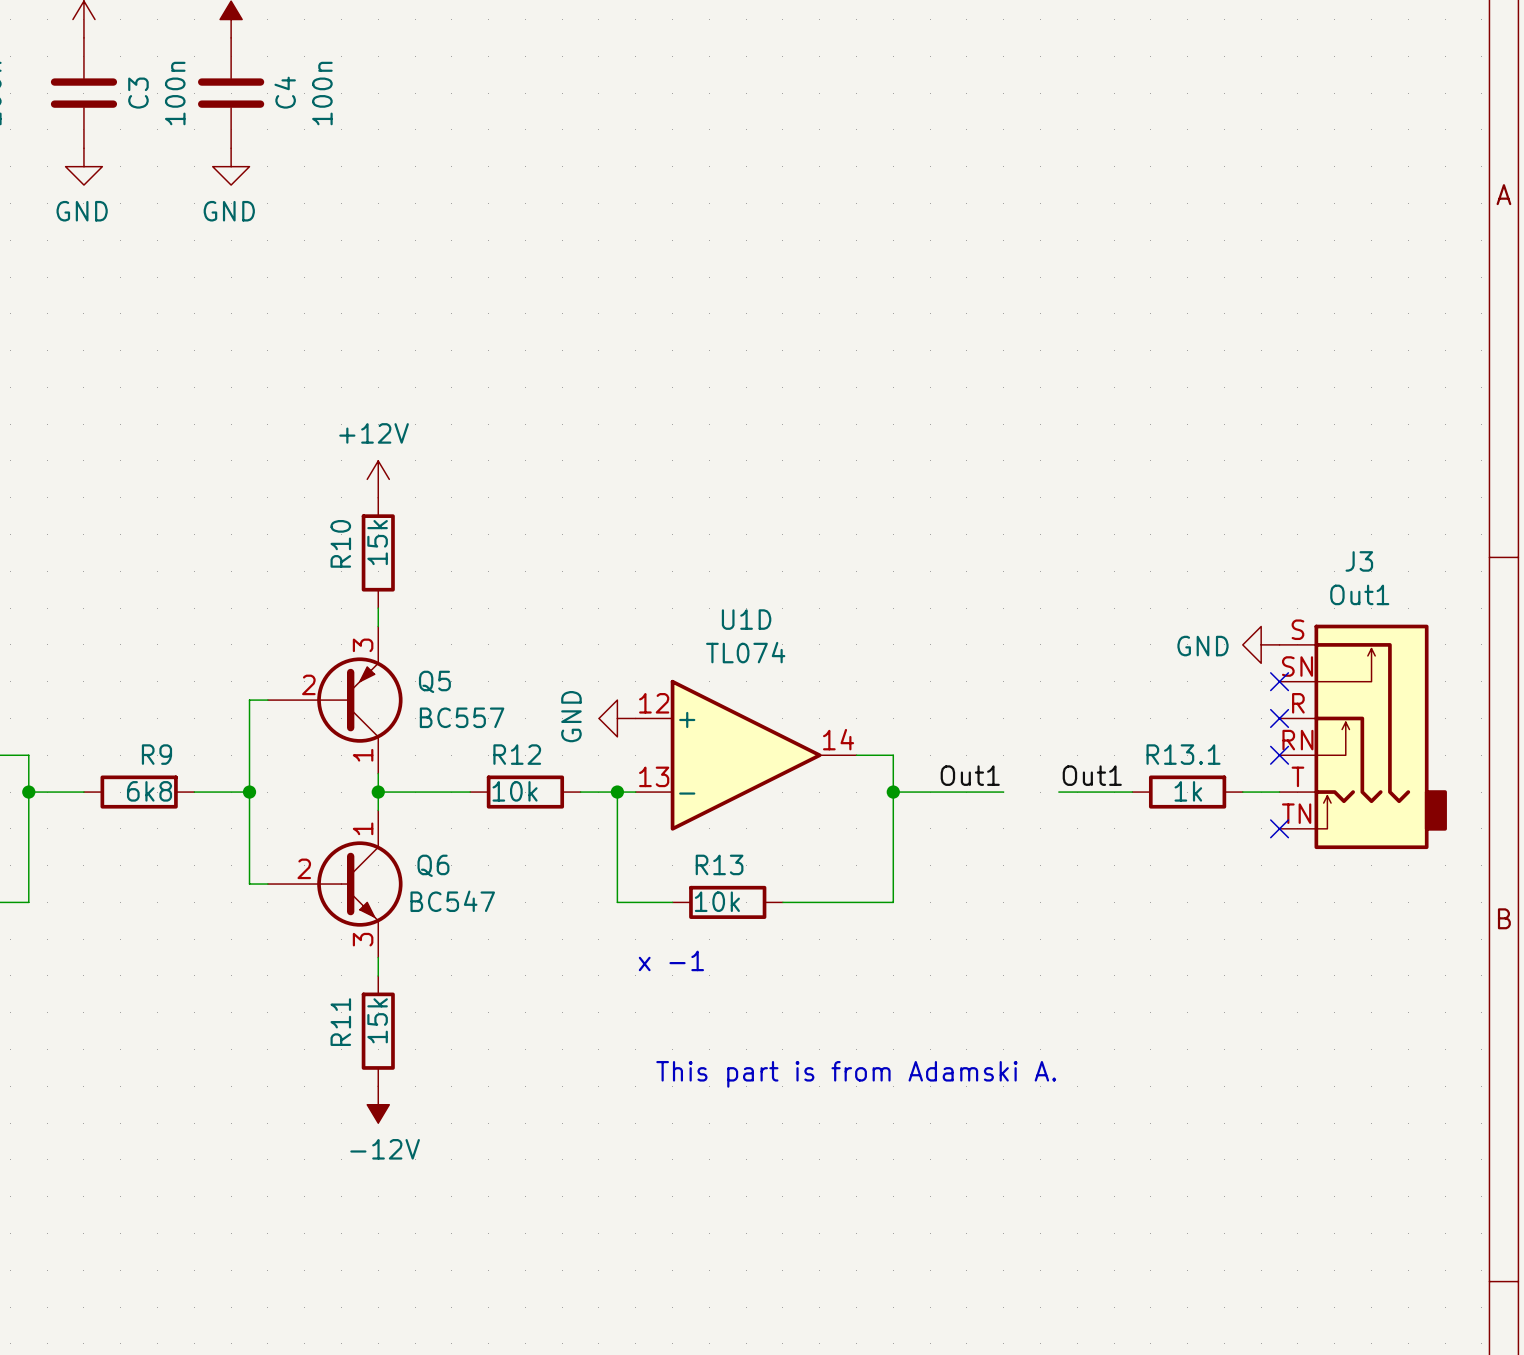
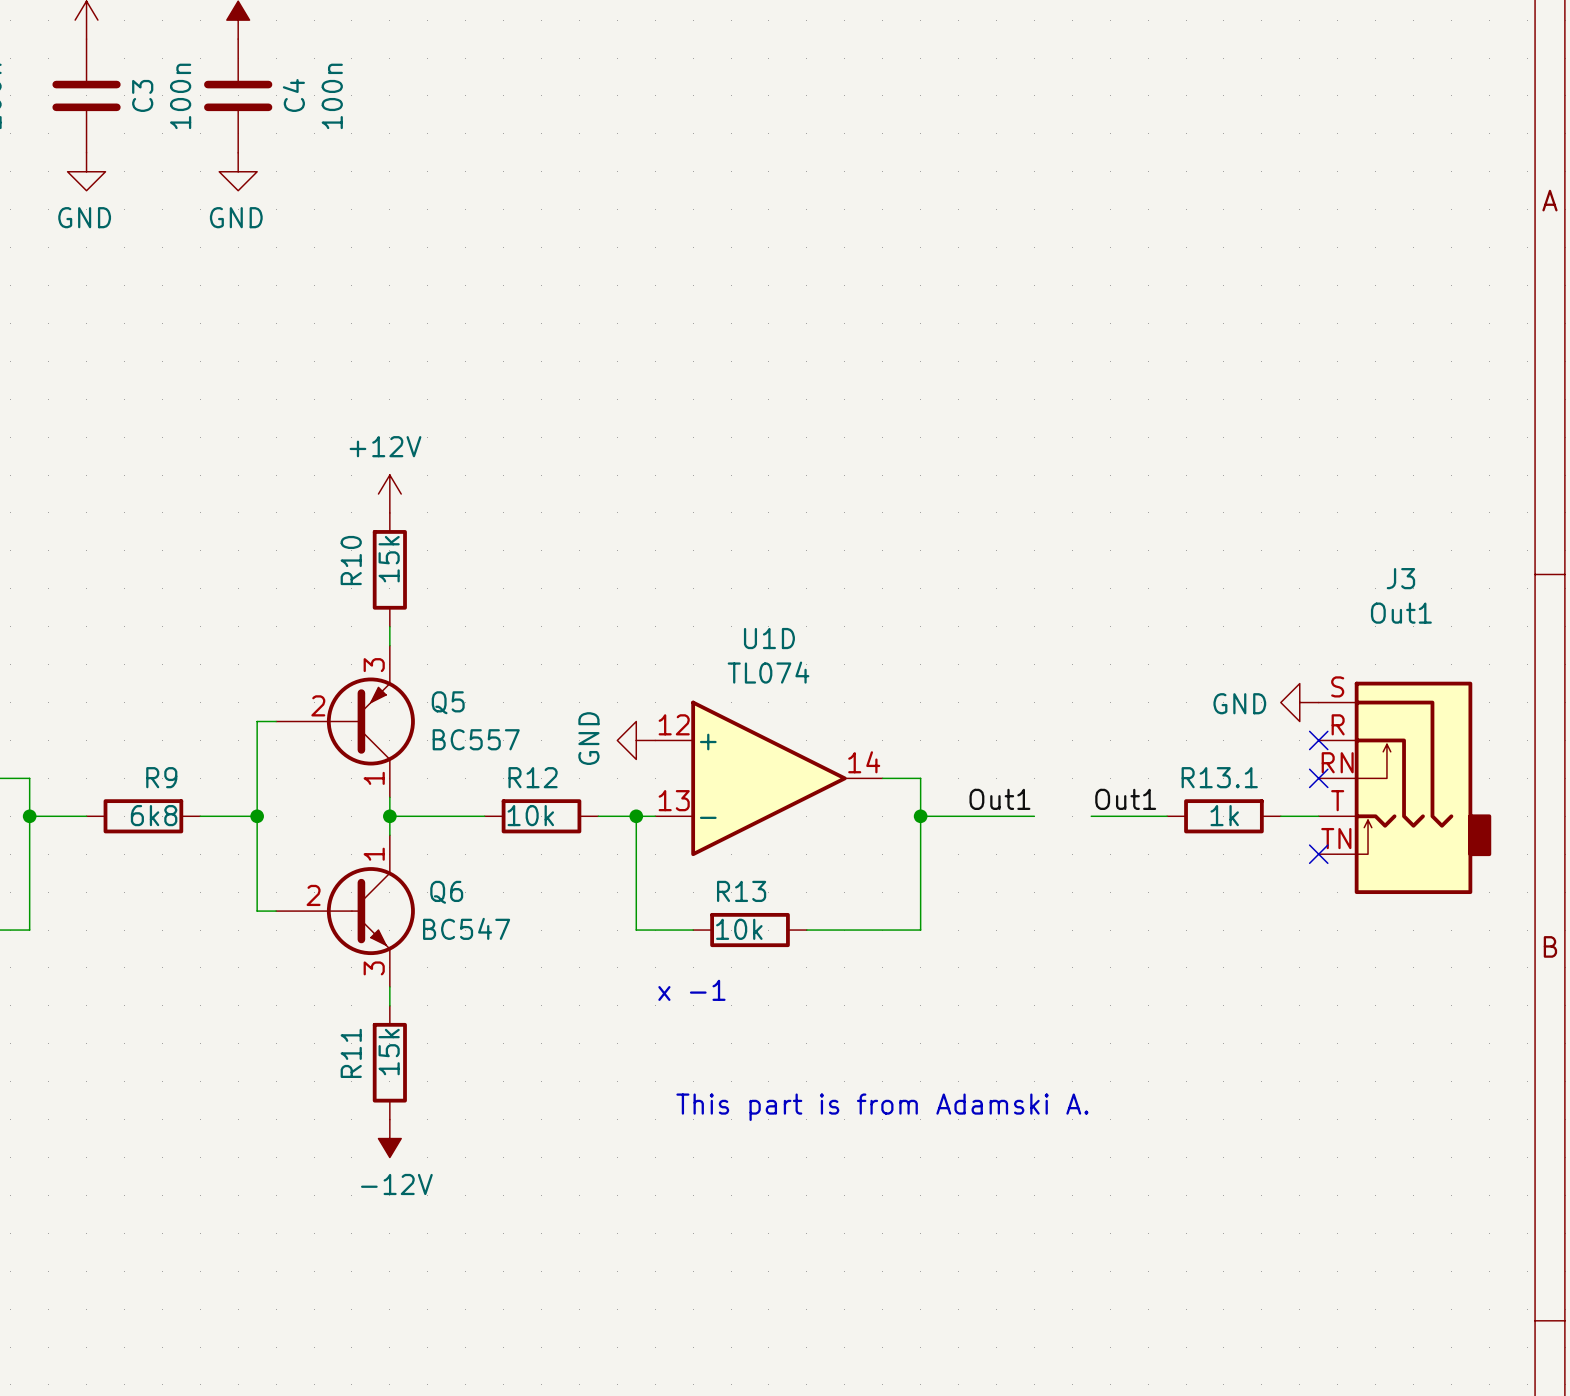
J3 symbol: [1279, 624, 1447, 850] -> [1318, 681, 1492, 895]
power symbol position: GND (1261, 644) -> GND (1299, 702)
no-connect mark: (1279, 681) -> none

